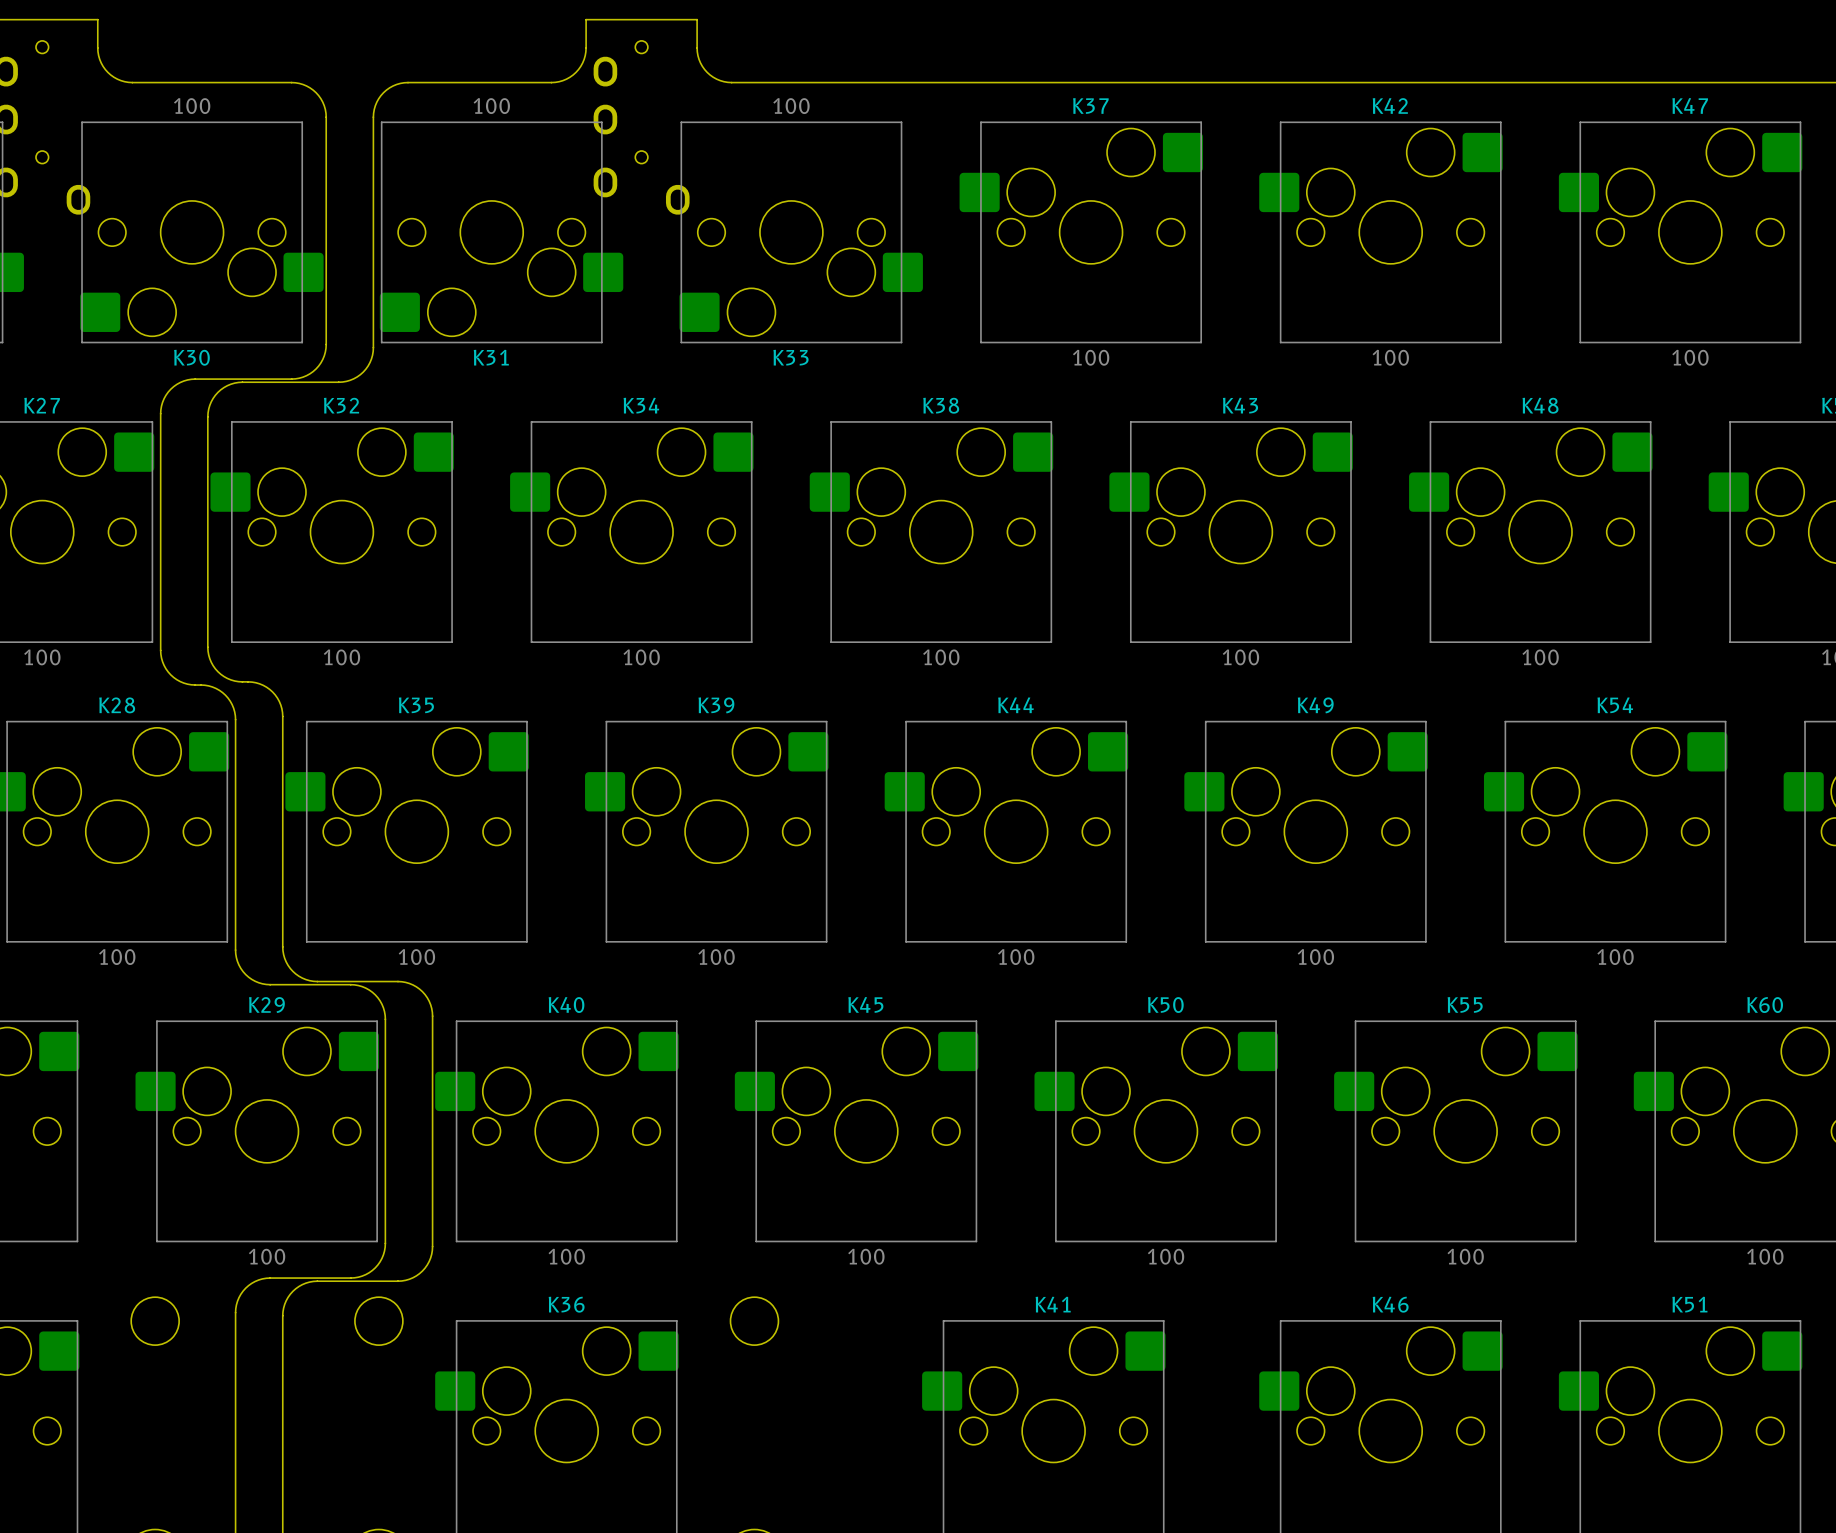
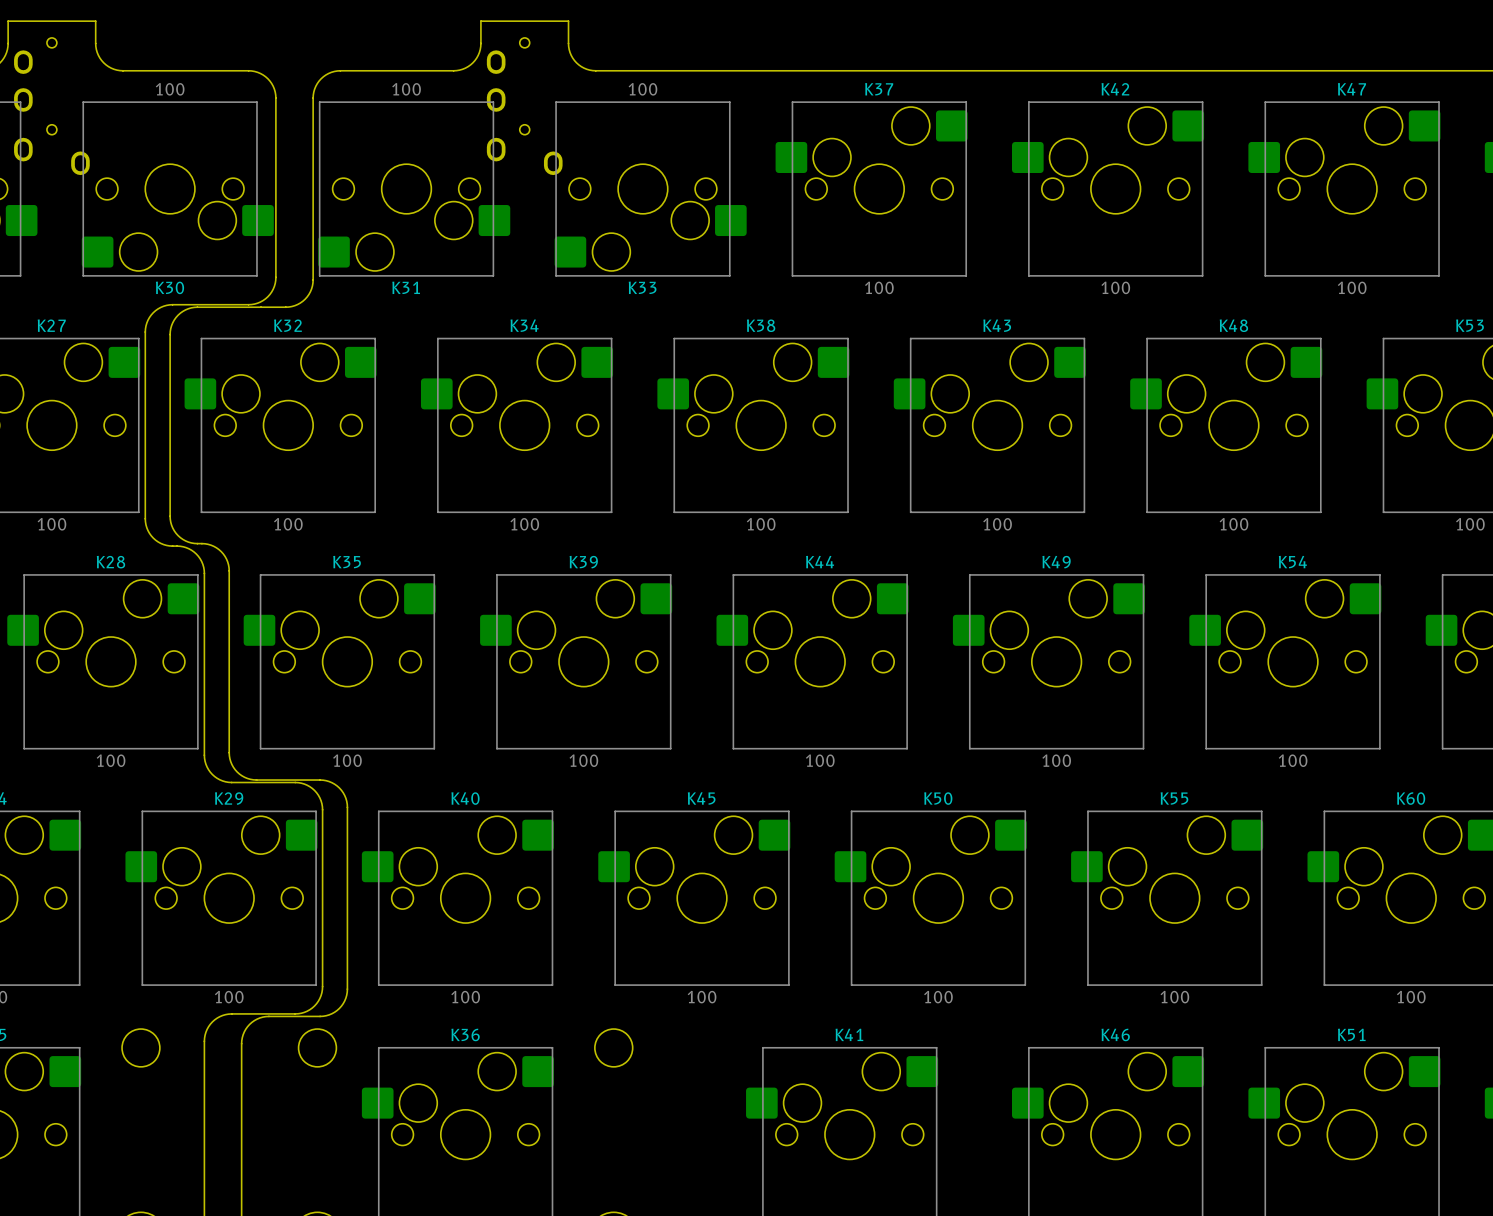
board edge: (242, 382) (231, 384) (220, 389) (213, 398) (208, 412) (208, 651) (213, 665) (220, 674) (234, 681) (252, 682) (263, 685) (275, 694) (280, 705) (282, 716) (282, 950) (288, 965) (295, 973) (305, 979) (317, 981) -> (209, 307) (194, 307) (185, 309) (176, 317) (170, 328) (170, 519) (172, 528) (180, 537) (191, 542) (213, 546) (221, 551) (227, 561) (229, 758) (235, 769) (244, 777) (253, 779) (268, 780)
board edge: (382, 981) (401, 981) (416, 986) (427, 997) (432, 1016) (431, 1254) (425, 1268) (412, 1277) (401, 1280) (382, 1281) -> (320, 780) (331, 782) (339, 788) (344, 795) (347, 807) (347, 992) (344, 1000) (339, 1008) (331, 1013) (320, 1016)

